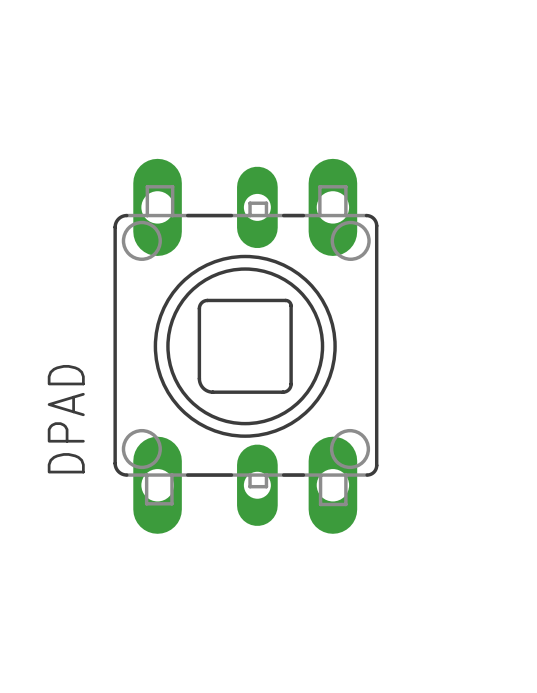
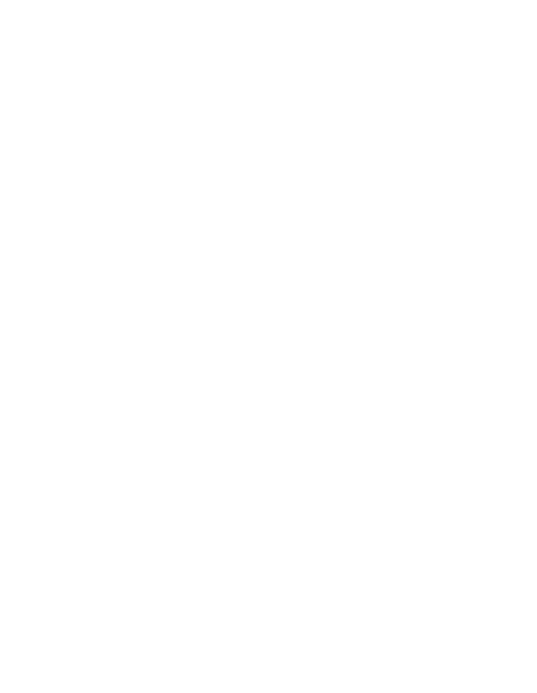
DPAD: (245, 346) -> none

